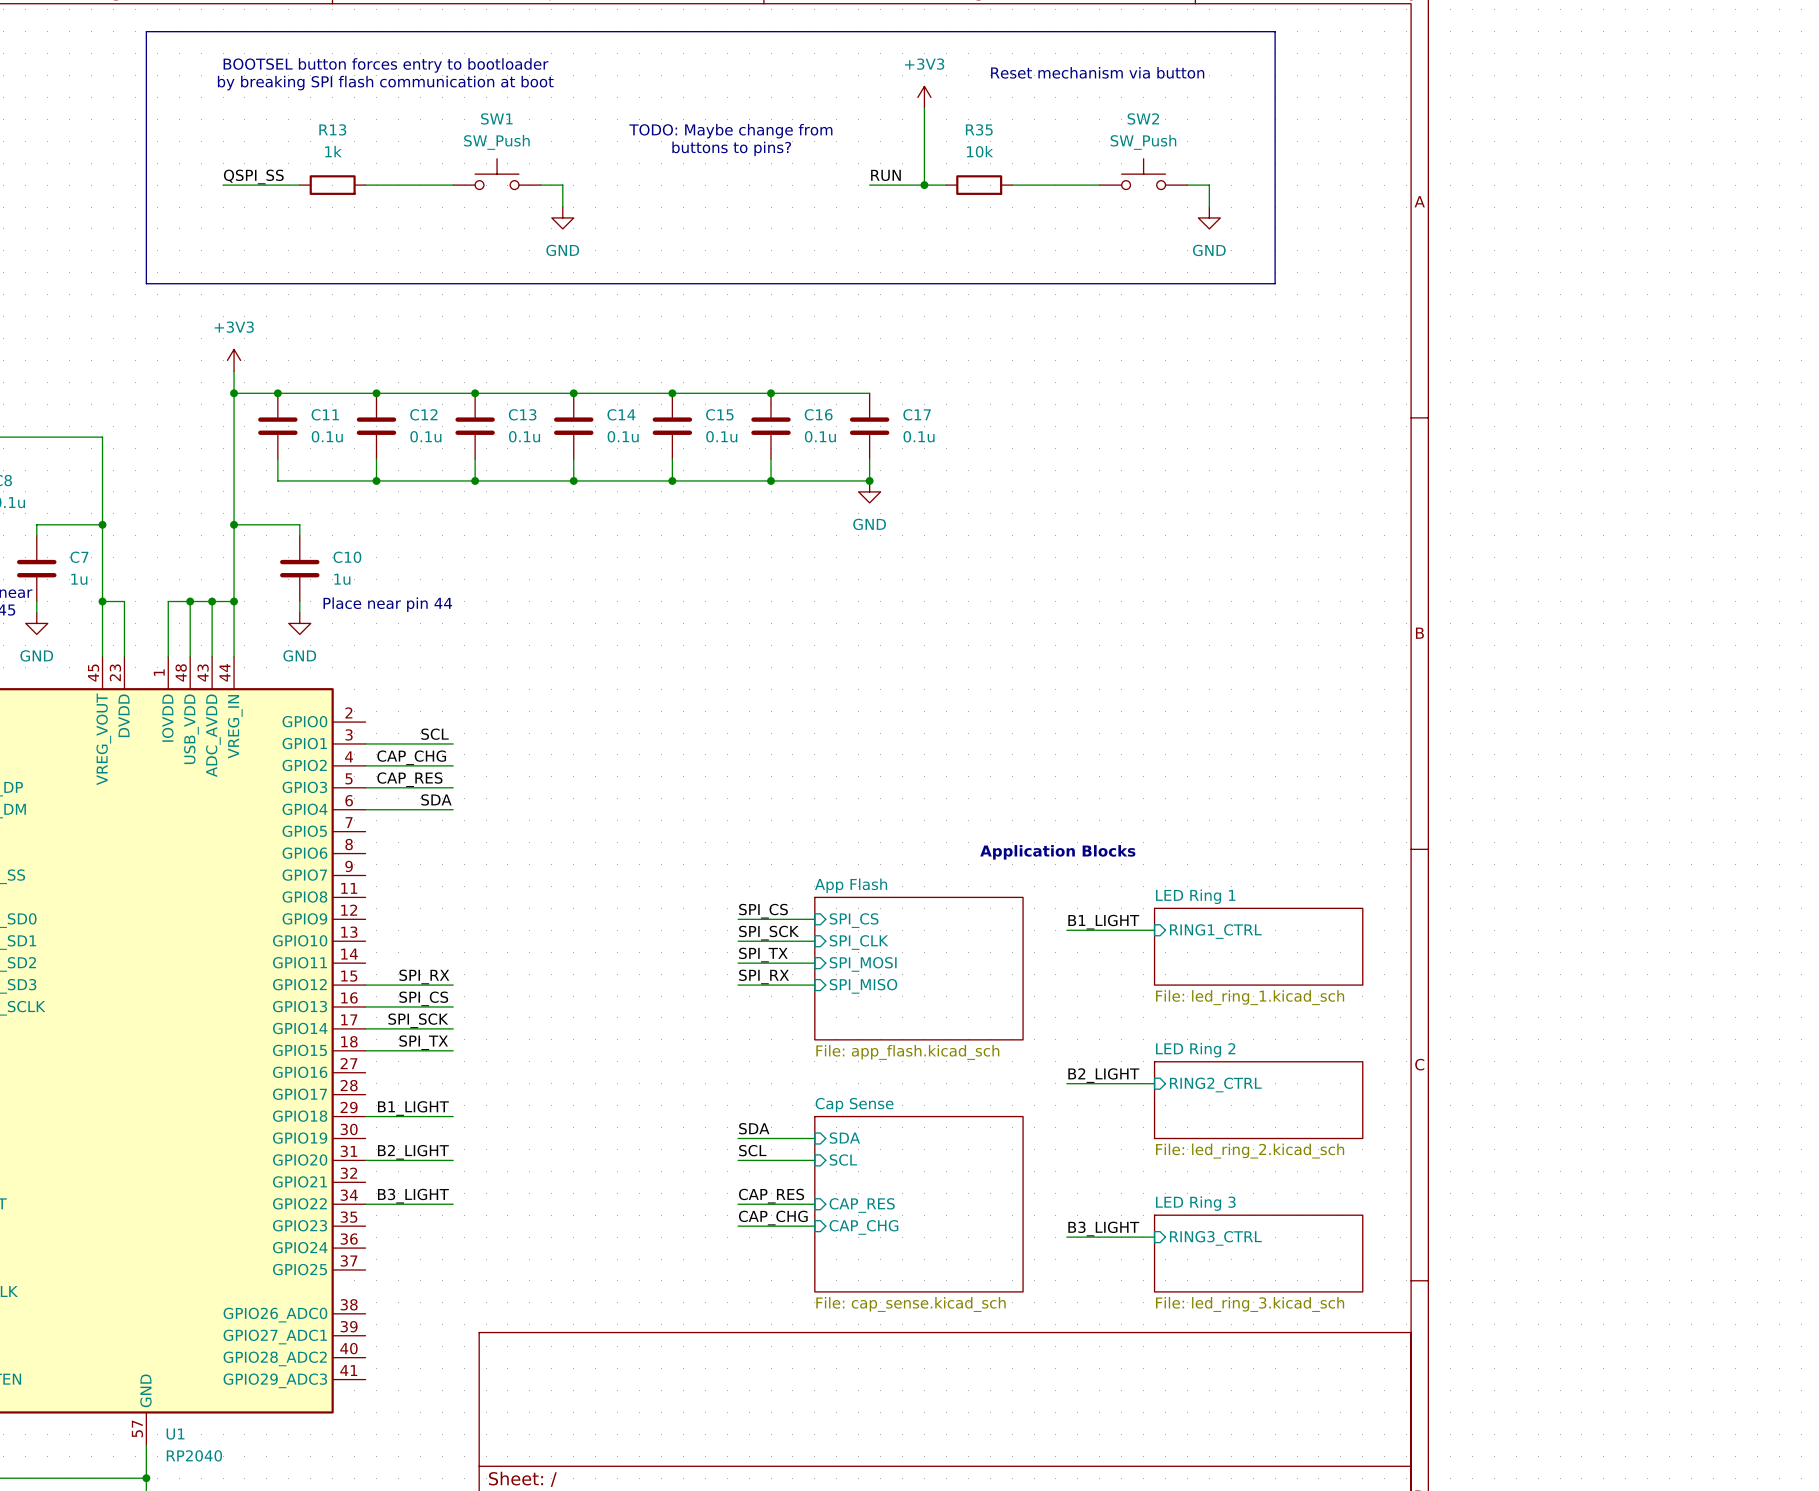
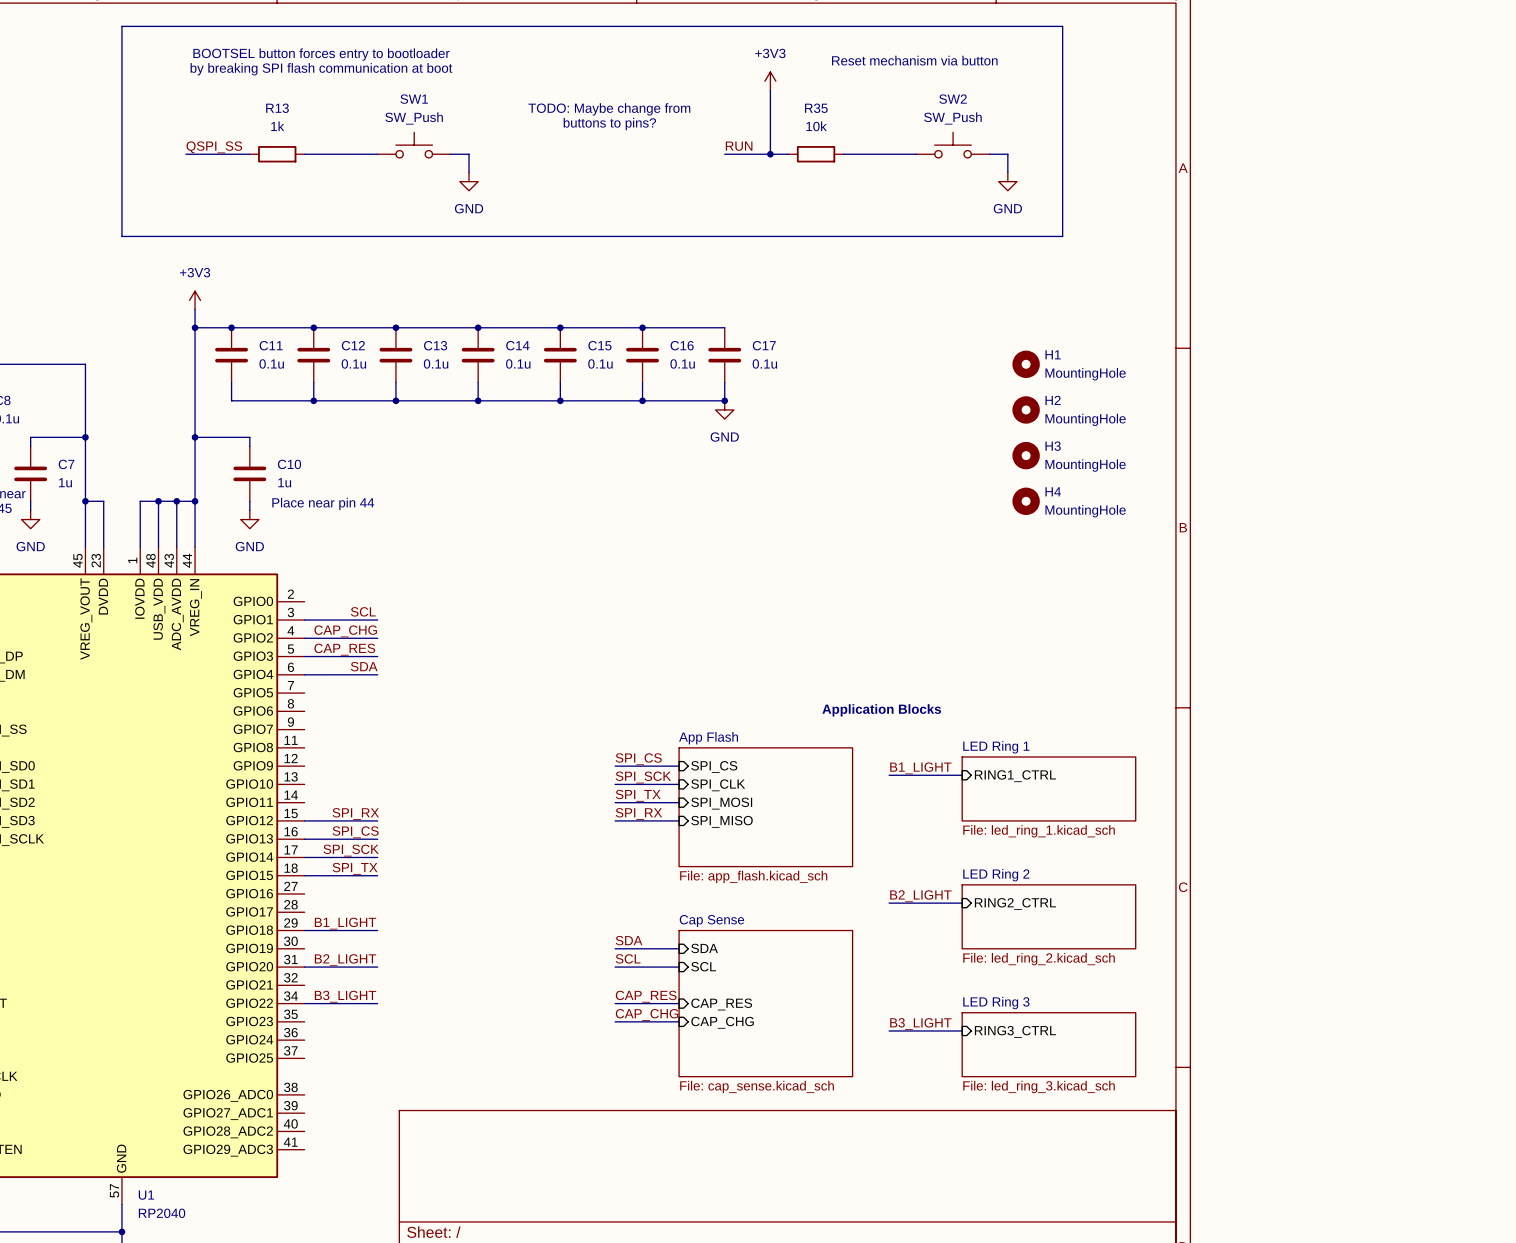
H1: none -> MountingHole (1026, 364)
H2: none -> MountingHole (1026, 409)
H3: none -> MountingHole (1026, 455)
H4: none -> MountingHole (1026, 501)

